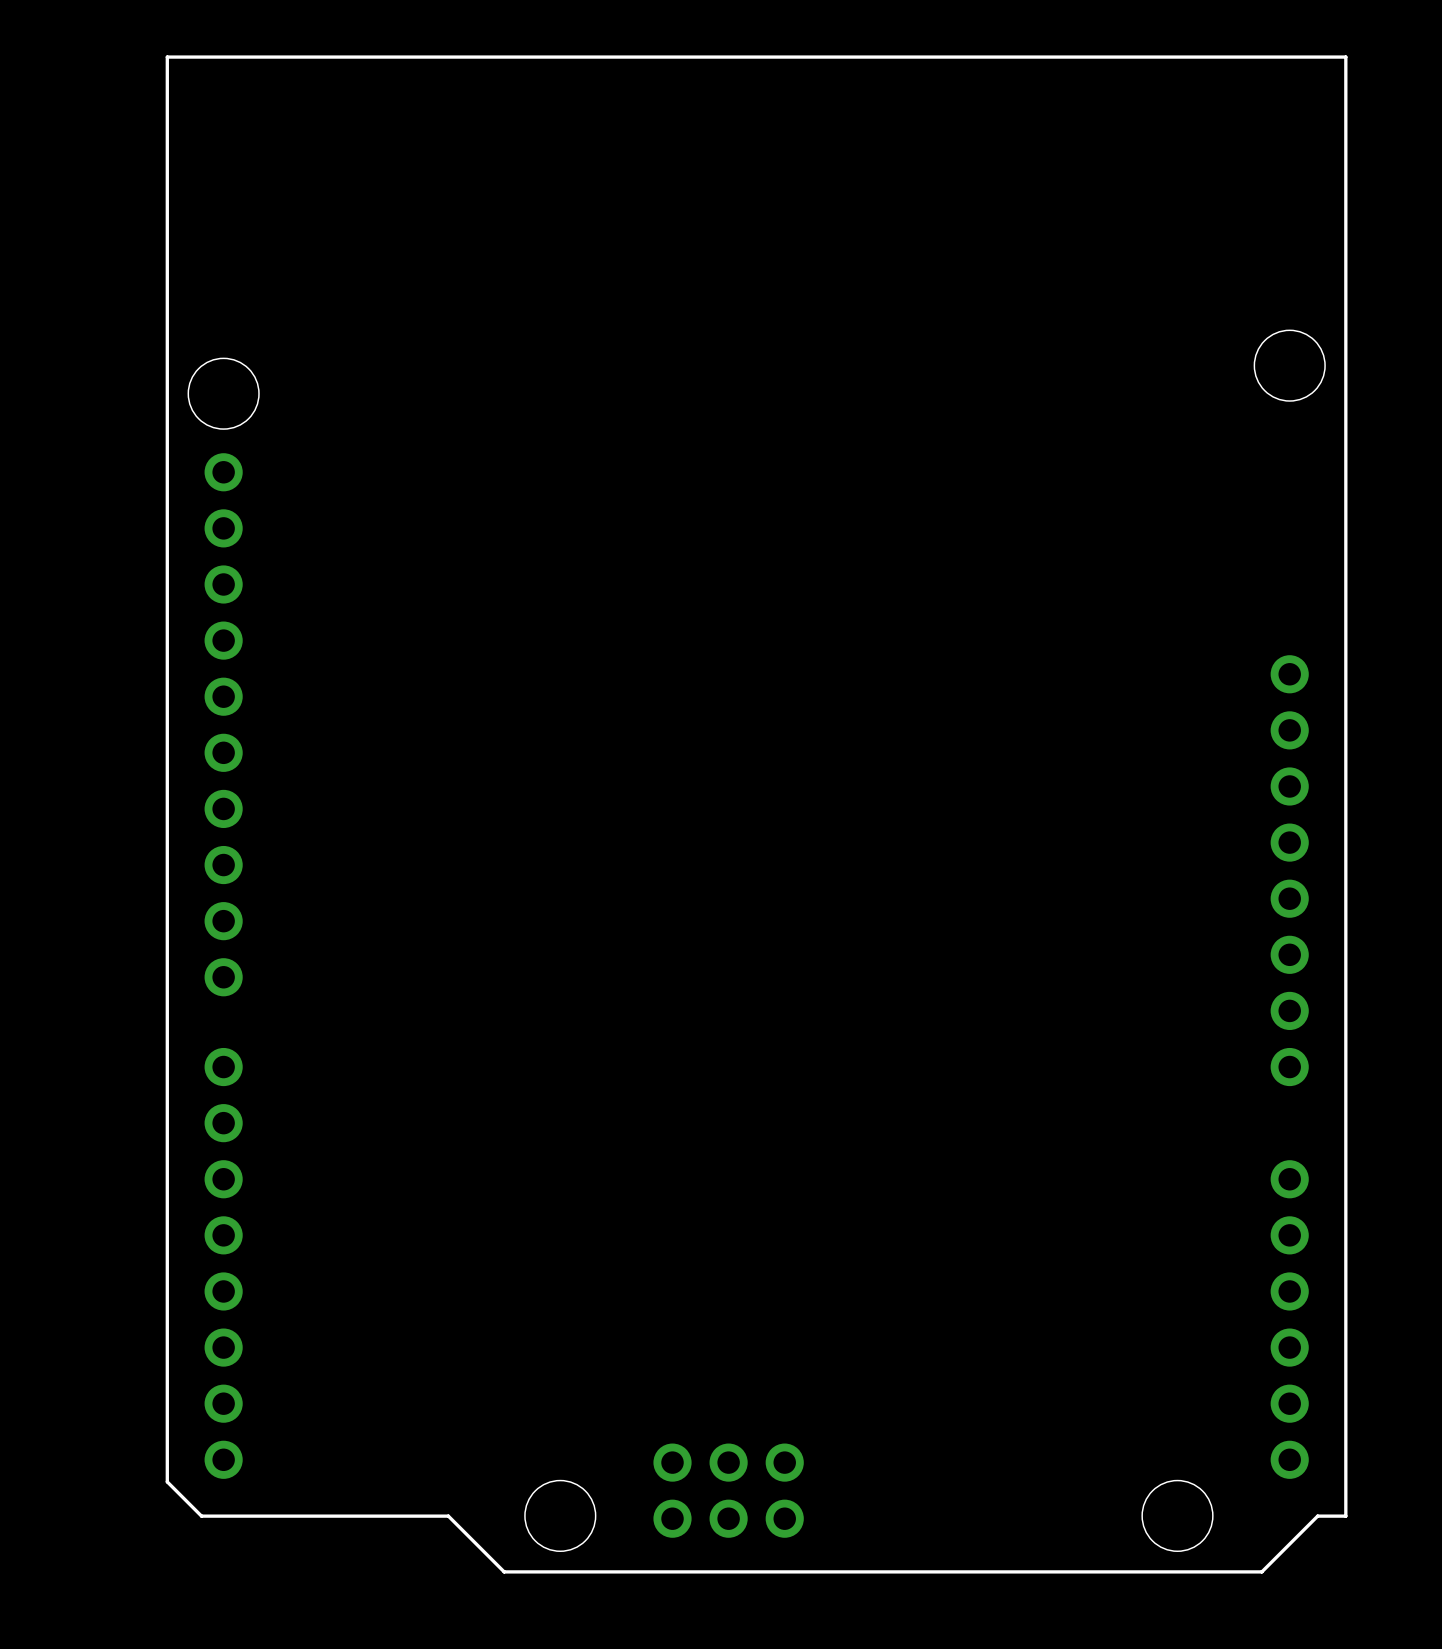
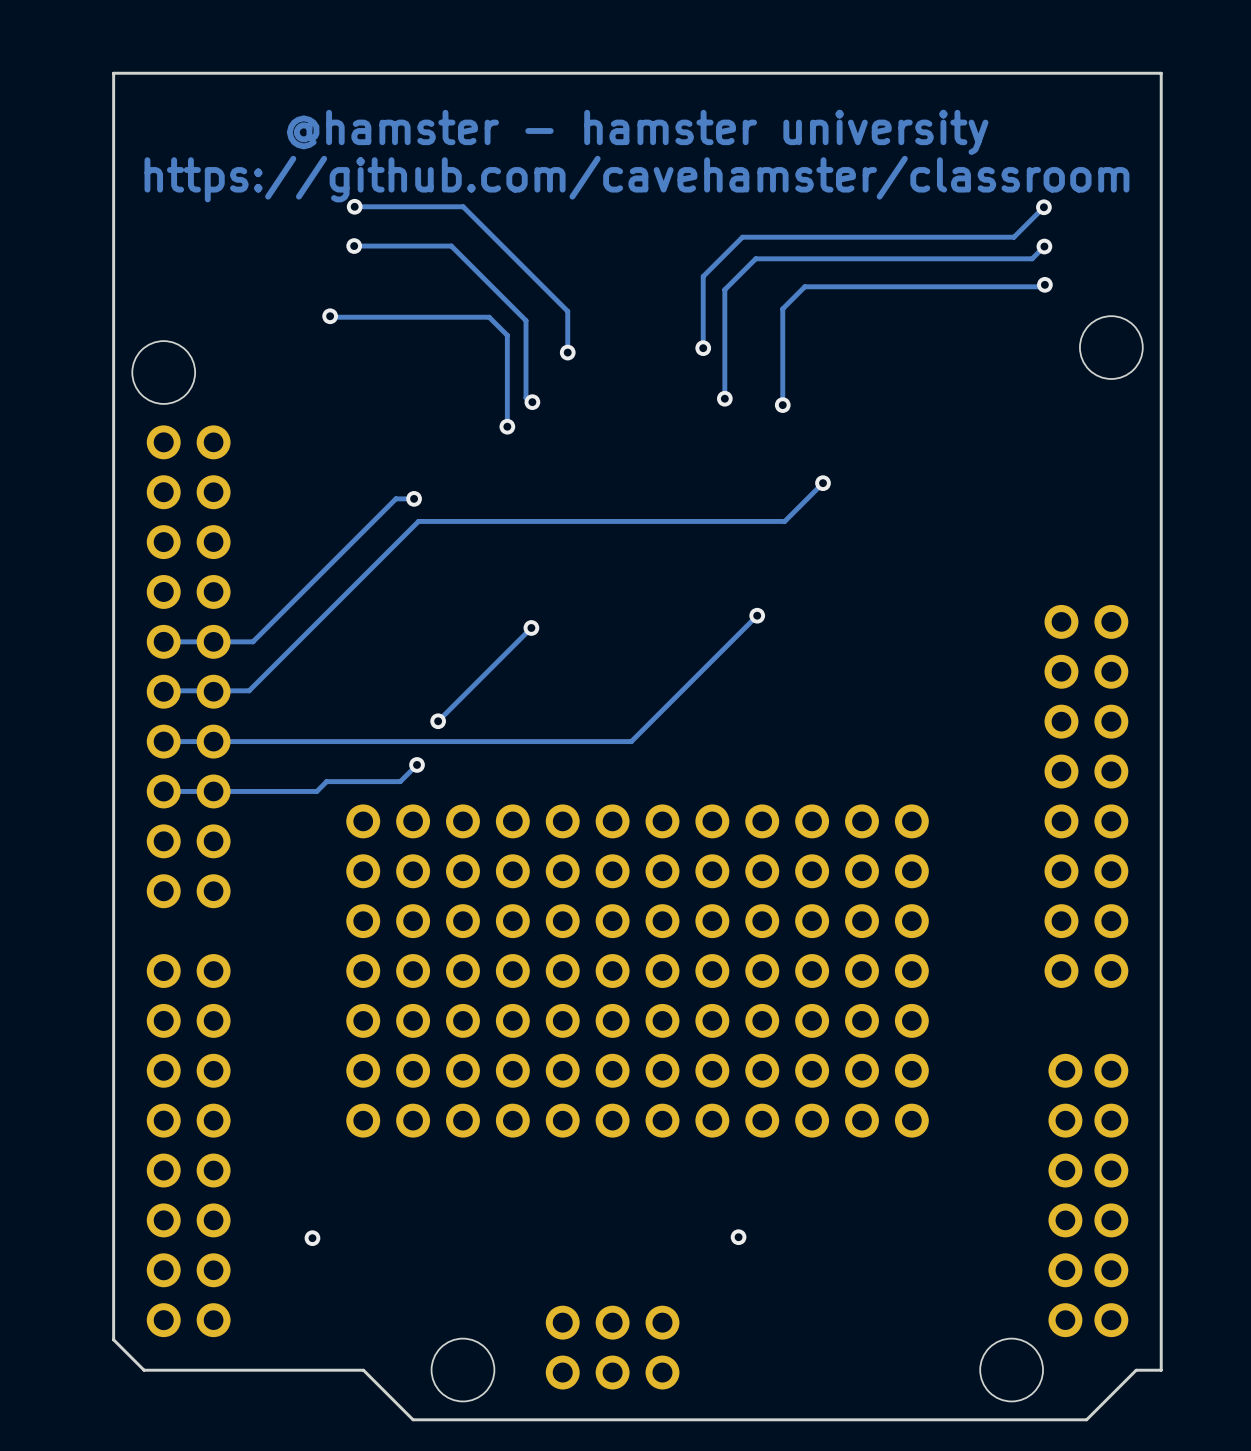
text: none -> @hamster - hamster university (637, 132)
text: none -> https://github.com/cavehamster/classroom (636, 179)
track: none -> (354, 206) (463, 206) (567, 311) (567, 352)
via: none -> (354, 206)
track: none -> (1043, 207) (1013, 237) (742, 237) (703, 276) (703, 348)
via: none -> (1043, 207)
track: none -> (354, 246) (451, 246) (526, 320) (526, 397) (532, 402)
via: none -> (354, 246)
track: none -> (1044, 246) (1032, 258) (755, 258) (724, 289) (724, 398)
via: none -> (1044, 246)
track: none -> (1044, 284) (1042, 286) (804, 286) (782, 308) (782, 405)
via: none -> (1044, 284)
track: none -> (330, 316) (489, 317) (507, 335) (507, 426)
via: none -> (330, 316)
via: none -> (703, 348)
via: none -> (567, 352)
via: none -> (724, 398)
via: none -> (532, 402)
via: none -> (782, 405)
via: none -> (507, 426)
part: none -> (213, 442)
track: none -> (823, 483) (784, 521) (418, 521) (249, 690) (163, 691)
via: none -> (823, 483)
part: none -> (213, 492)
track: none -> (414, 498) (395, 498) (252, 641) (163, 641)
via: none -> (414, 498)
part: none -> (213, 542)
part: none -> (213, 591)
track: none -> (757, 615) (631, 741) (163, 741)
via: none -> (757, 615)
part: none -> (1061, 621)
track: none -> (531, 627) (438, 721)
via: none -> (531, 627)
part: none -> (213, 641)
part: none -> (1061, 671)
part: none -> (213, 691)
via: none -> (438, 721)
part: none -> (1061, 721)
part: none -> (213, 741)
track: none -> (417, 764) (400, 781) (326, 781) (316, 791) (163, 791)
via: none -> (417, 764)
part: none -> (1061, 771)
part: none -> (213, 791)
part: none -> (363, 821)
part: none -> (413, 821)
part: none -> (462, 821)
part: none -> (512, 821)
part: none -> (562, 821)
part: none -> (612, 821)
part: none -> (662, 821)
part: none -> (712, 821)
part: none -> (762, 821)
part: none -> (812, 821)
part: none -> (861, 821)
part: none -> (911, 821)
part: none -> (1061, 821)
part: none -> (213, 841)
part: none -> (363, 871)
part: none -> (413, 871)
part: none -> (462, 871)
part: none -> (512, 871)
part: none -> (562, 871)
part: none -> (612, 871)
part: none -> (662, 871)
part: none -> (712, 871)
part: none -> (762, 871)
part: none -> (812, 871)
part: none -> (861, 871)
part: none -> (911, 871)
part: none -> (1061, 871)
part: none -> (213, 891)
part: none -> (363, 921)
part: none -> (413, 921)
part: none -> (462, 921)
part: none -> (512, 921)
part: none -> (562, 921)
part: none -> (612, 921)
part: none -> (662, 921)
part: none -> (712, 921)
part: none -> (762, 921)
part: none -> (812, 921)
part: none -> (861, 921)
part: none -> (911, 921)
part: none -> (1061, 921)
part: none -> (213, 971)
part: none -> (363, 971)
part: none -> (413, 971)
part: none -> (462, 971)
part: none -> (512, 971)
part: none -> (562, 971)
part: none -> (612, 971)
part: none -> (662, 971)
part: none -> (712, 971)
part: none -> (762, 971)
part: none -> (812, 971)
part: none -> (861, 971)
part: none -> (911, 971)
part: none -> (1061, 971)
part: none -> (213, 1020)
part: none -> (363, 1020)
part: none -> (413, 1020)
part: none -> (462, 1020)
part: none -> (512, 1020)
part: none -> (562, 1020)
part: none -> (612, 1020)
part: none -> (662, 1020)
part: none -> (712, 1020)
part: none -> (762, 1020)
part: none -> (812, 1020)
part: none -> (861, 1020)
part: none -> (911, 1020)
part: none -> (213, 1070)
part: none -> (363, 1070)
part: none -> (413, 1070)
part: none -> (462, 1070)
part: none -> (512, 1070)
part: none -> (562, 1070)
part: none -> (612, 1070)
part: none -> (662, 1070)
part: none -> (712, 1070)
part: none -> (762, 1070)
part: none -> (812, 1070)
part: none -> (861, 1070)
part: none -> (911, 1070)
part: none -> (1065, 1070)
part: none -> (213, 1120)
part: none -> (363, 1120)
part: none -> (413, 1120)
part: none -> (462, 1120)
part: none -> (512, 1120)
part: none -> (562, 1120)
part: none -> (612, 1120)
part: none -> (662, 1120)
part: none -> (712, 1120)
part: none -> (762, 1120)
part: none -> (812, 1120)
part: none -> (861, 1120)
part: none -> (911, 1120)
part: none -> (1065, 1120)
part: none -> (213, 1170)
part: none -> (1065, 1170)
part: none -> (213, 1220)
part: none -> (1065, 1220)
via: none -> (738, 1237)
via: none -> (312, 1238)
part: none -> (213, 1270)
part: none -> (1065, 1270)
part: none -> (213, 1320)
part: none -> (1065, 1320)

